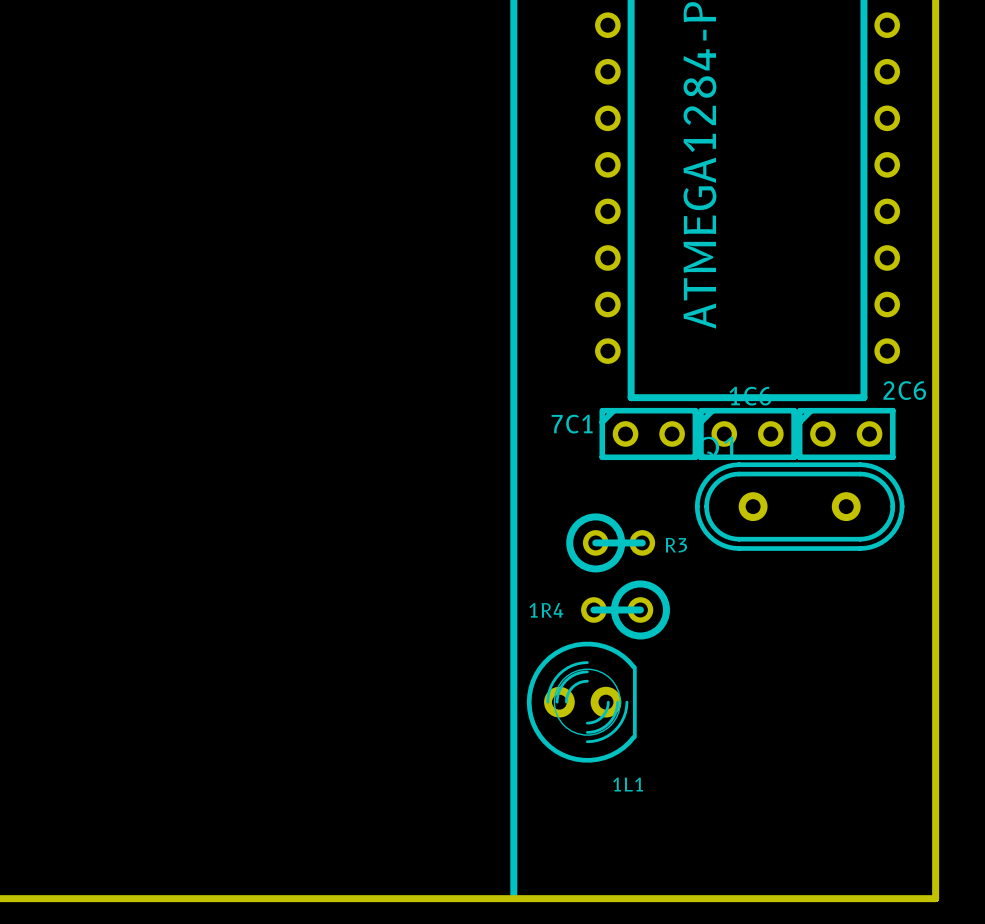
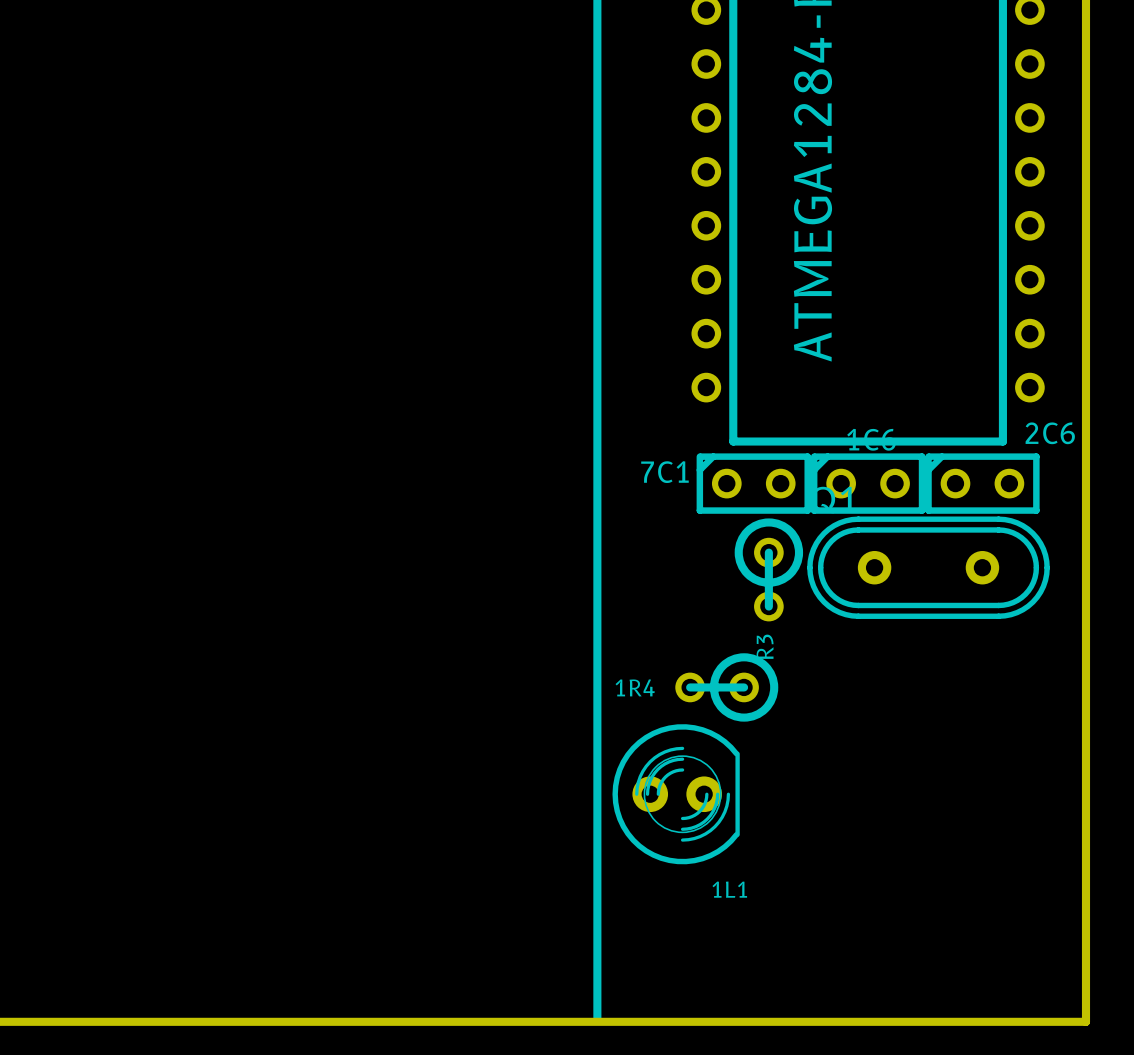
R3 rotation: 0° (610, 542) -> 90° clockwise (768, 569)
R3 position: (610, 542) -> (768, 569)

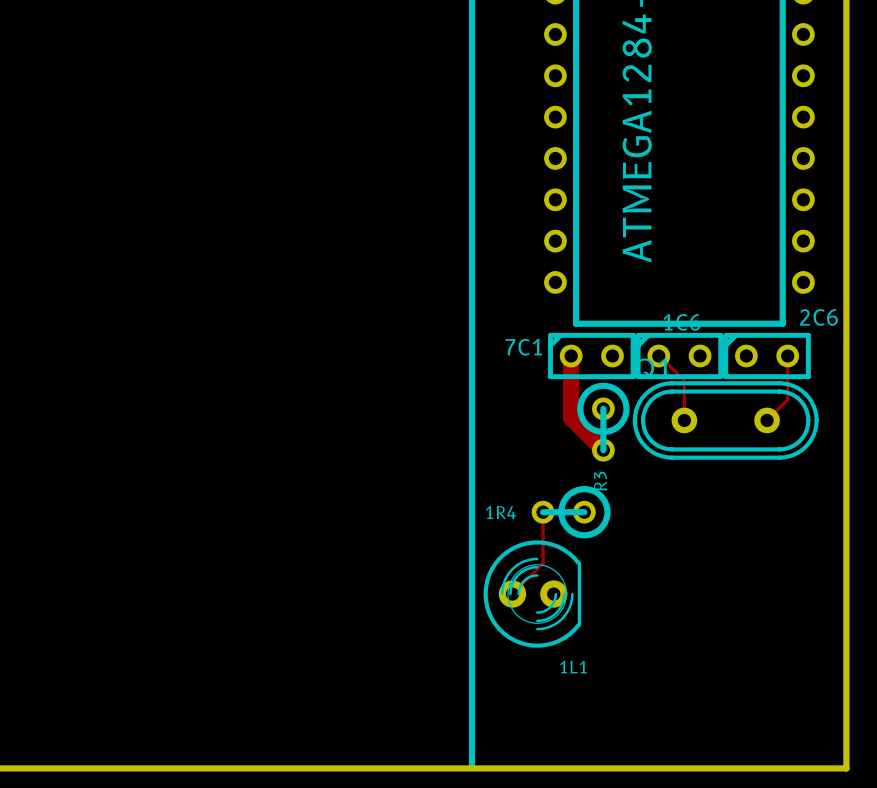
track: none -> (658, 355) (684, 380) (684, 420)
track: none -> (787, 355) (787, 399) (767, 420)
track: none -> (571, 355) (571, 417) (603, 450)
track: none -> (543, 512) (543, 563) (512, 594)

